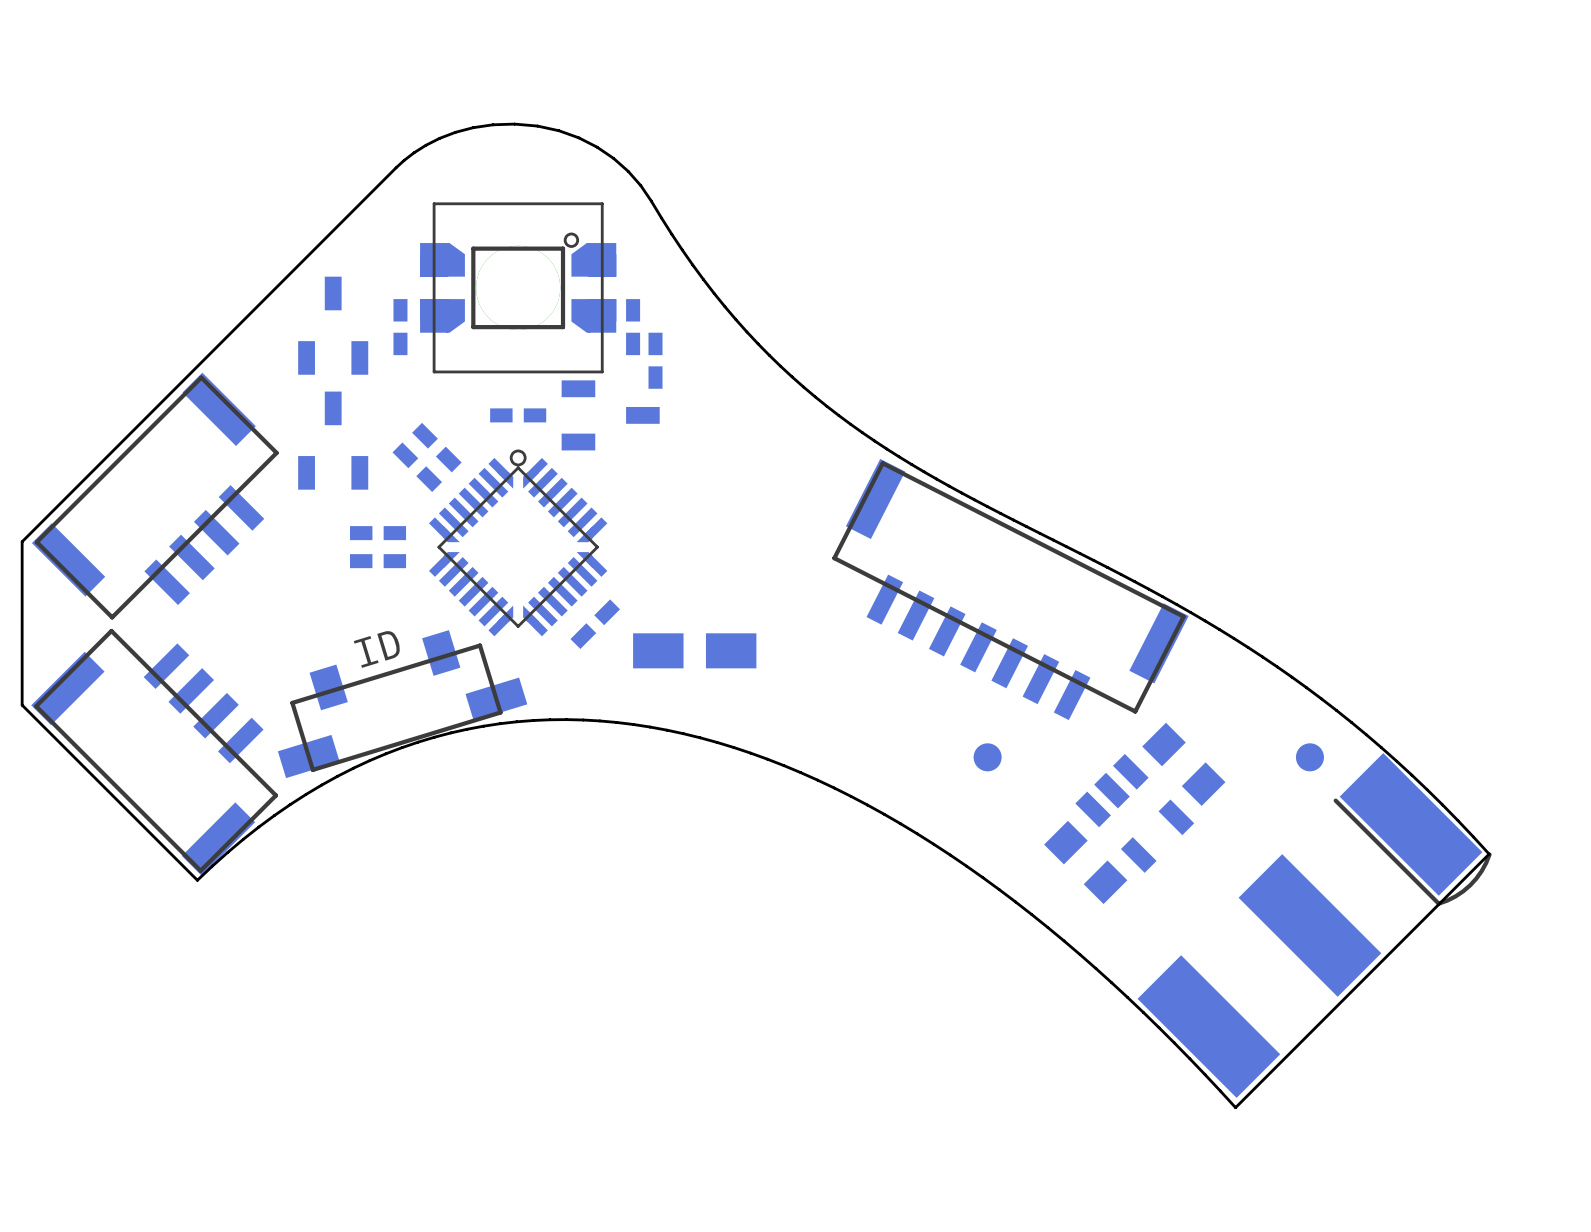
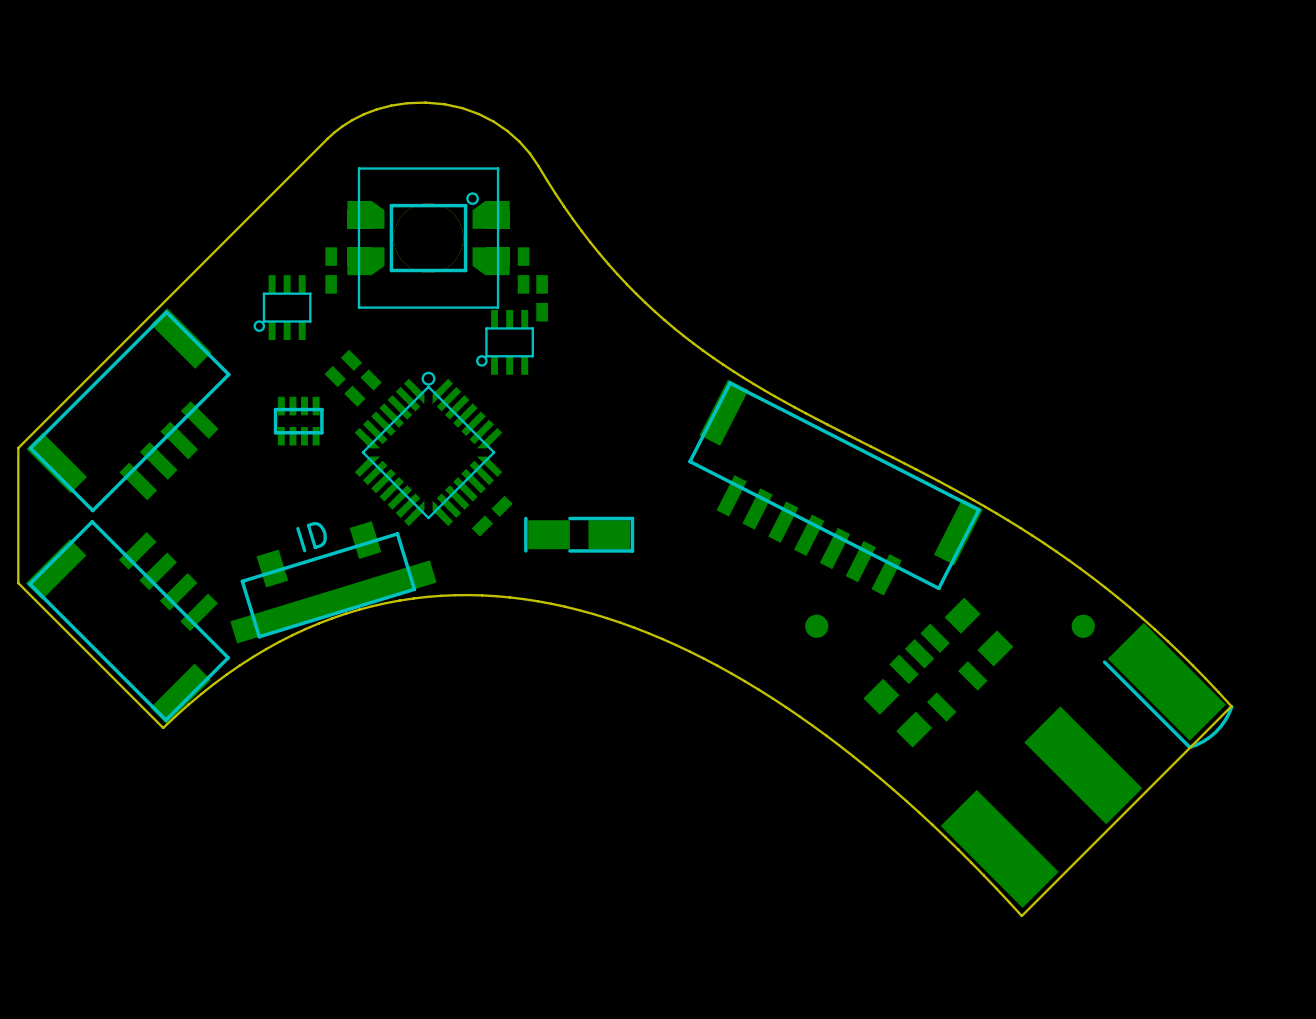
part: (333, 325) -> none
part: none -> (282, 307)
part footprint: [561, 380, 660, 451] -> [476, 309, 534, 375]
part: (518, 415) -> none
part: (333, 440) -> none
part: none -> (298, 421)
part: (378, 533) -> none
part: (378, 561) -> none
part footprint: [277, 630, 528, 779] -> [230, 521, 437, 644]
part footprint: [633, 633, 757, 669] -> [524, 516, 635, 553]

